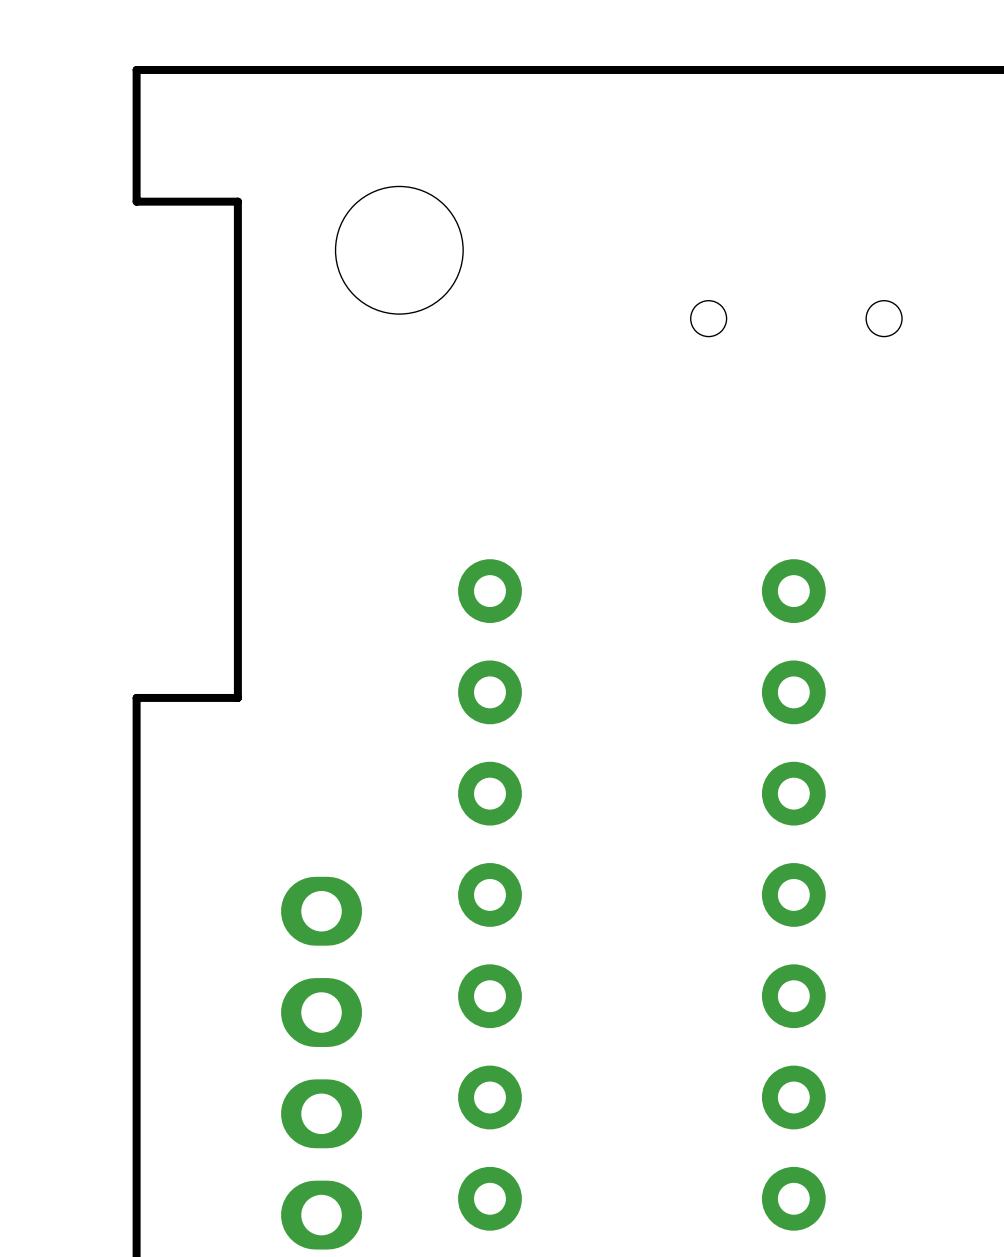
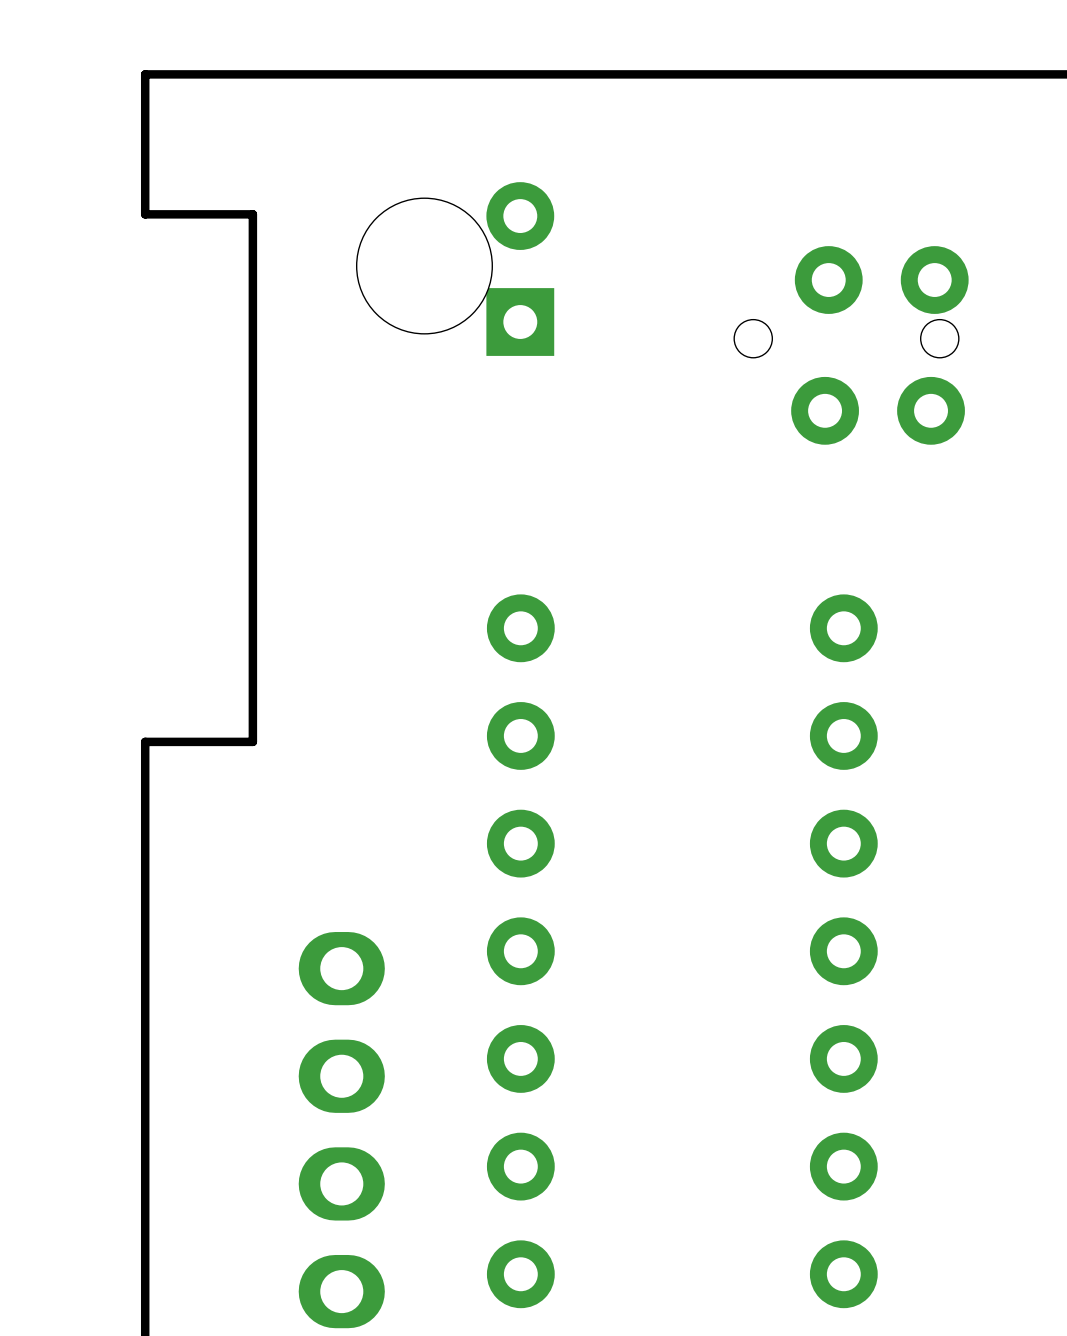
part: none -> (520, 269)
part: none -> (881, 280)
part: none -> (878, 410)

